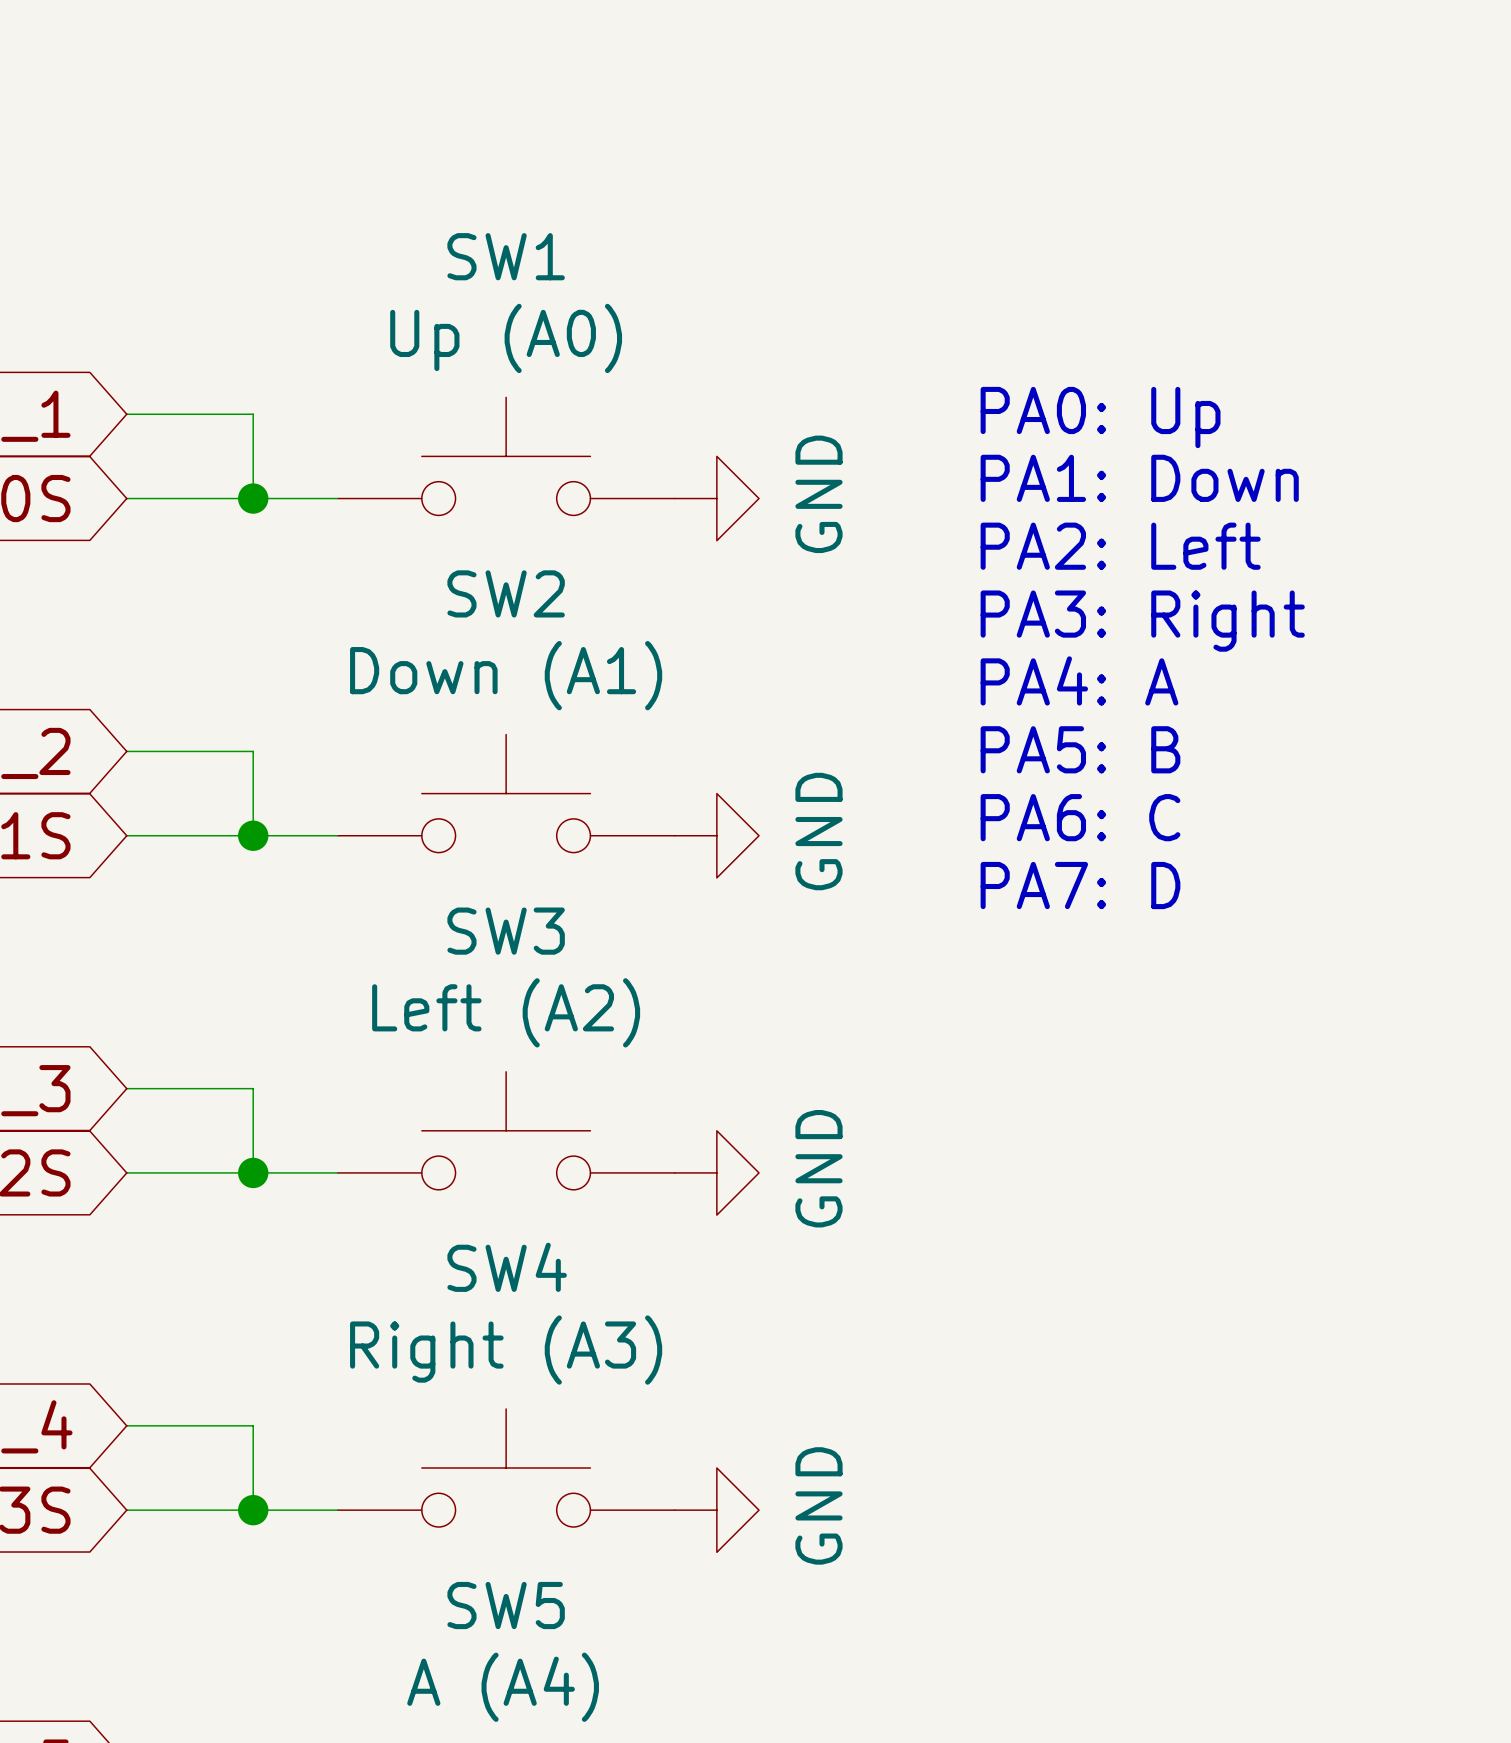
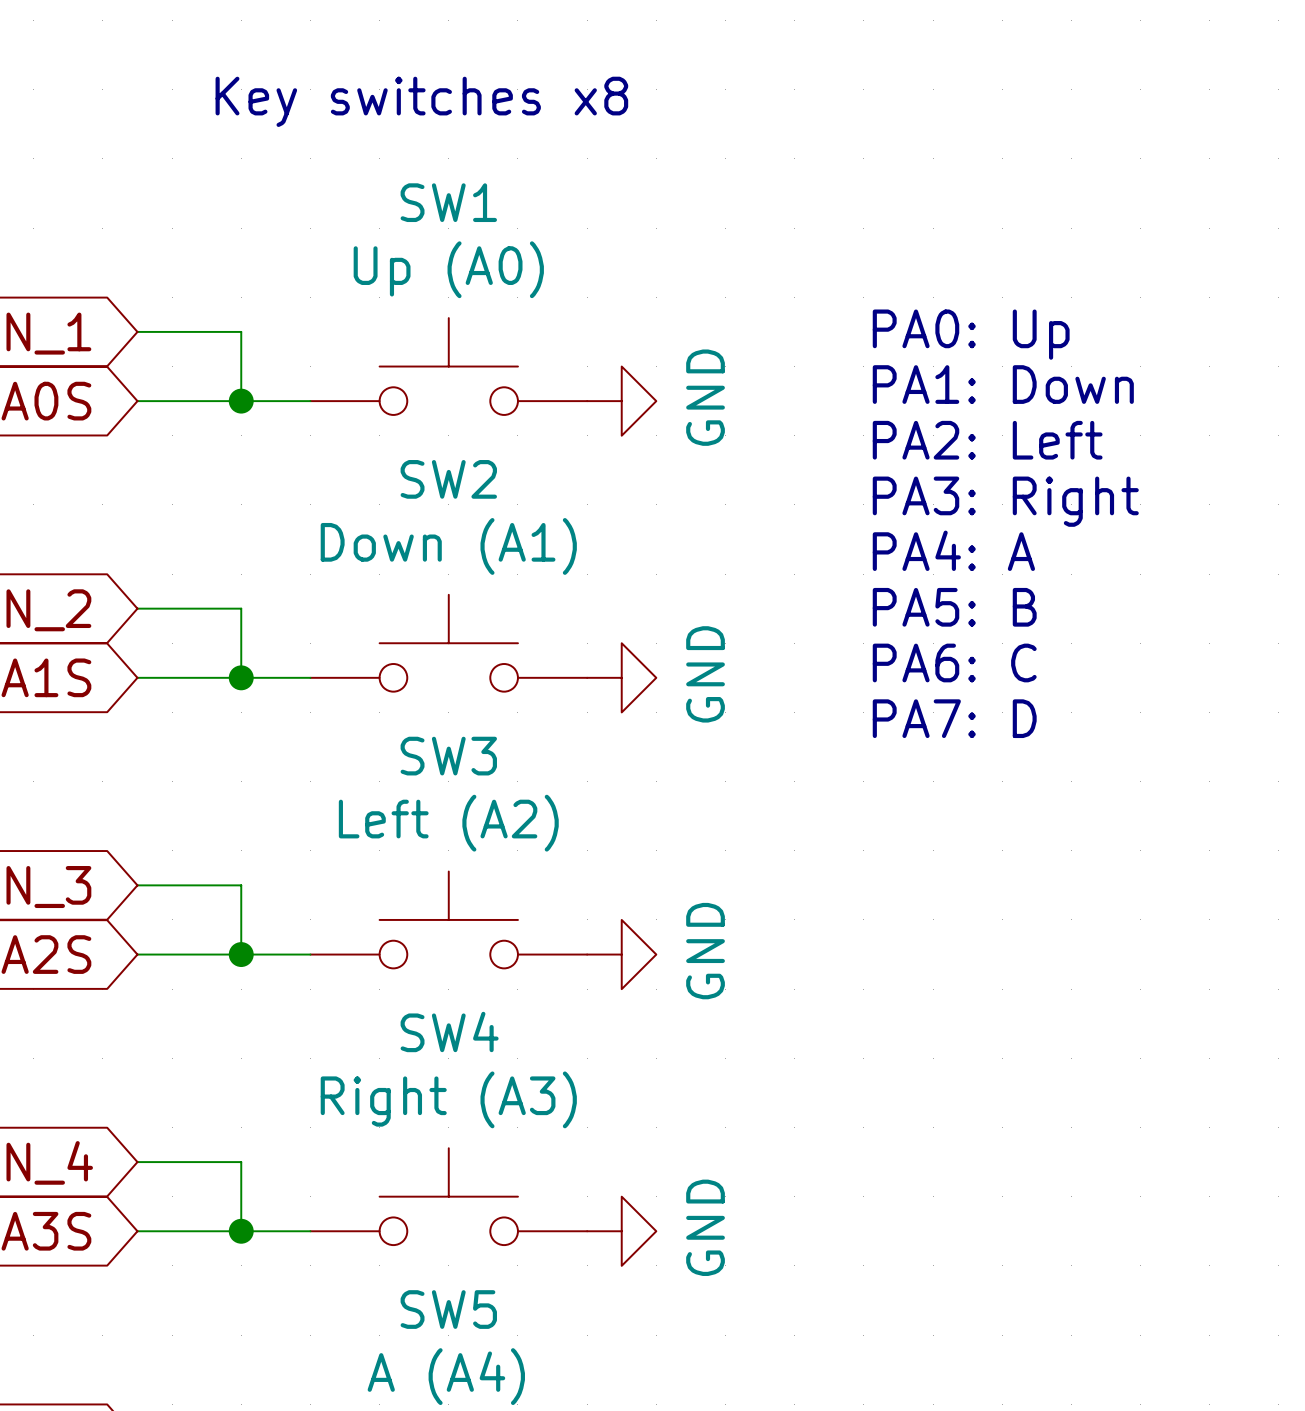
text: none -> Key switches x8 (421, 101)
text position: PA0: Up (1100, 417) -> PA0: Up (971, 334)
text position: PA1: Down (1139, 478) -> PA1: Down (1003, 384)
text position: PA2: Left (1120, 546) -> PA2: Left (987, 440)
text position: PA3: Right (1142, 621) -> PA3: Right (1005, 501)
text position: PA4: A (1079, 680) -> PA4: A (953, 550)
text position: PA5: B (1080, 749) -> PA5: B (954, 607)
text position: PA6: C (1080, 817) -> PA6: C (954, 662)
text position: PA7: D (1080, 885) -> PA7: D (954, 718)

